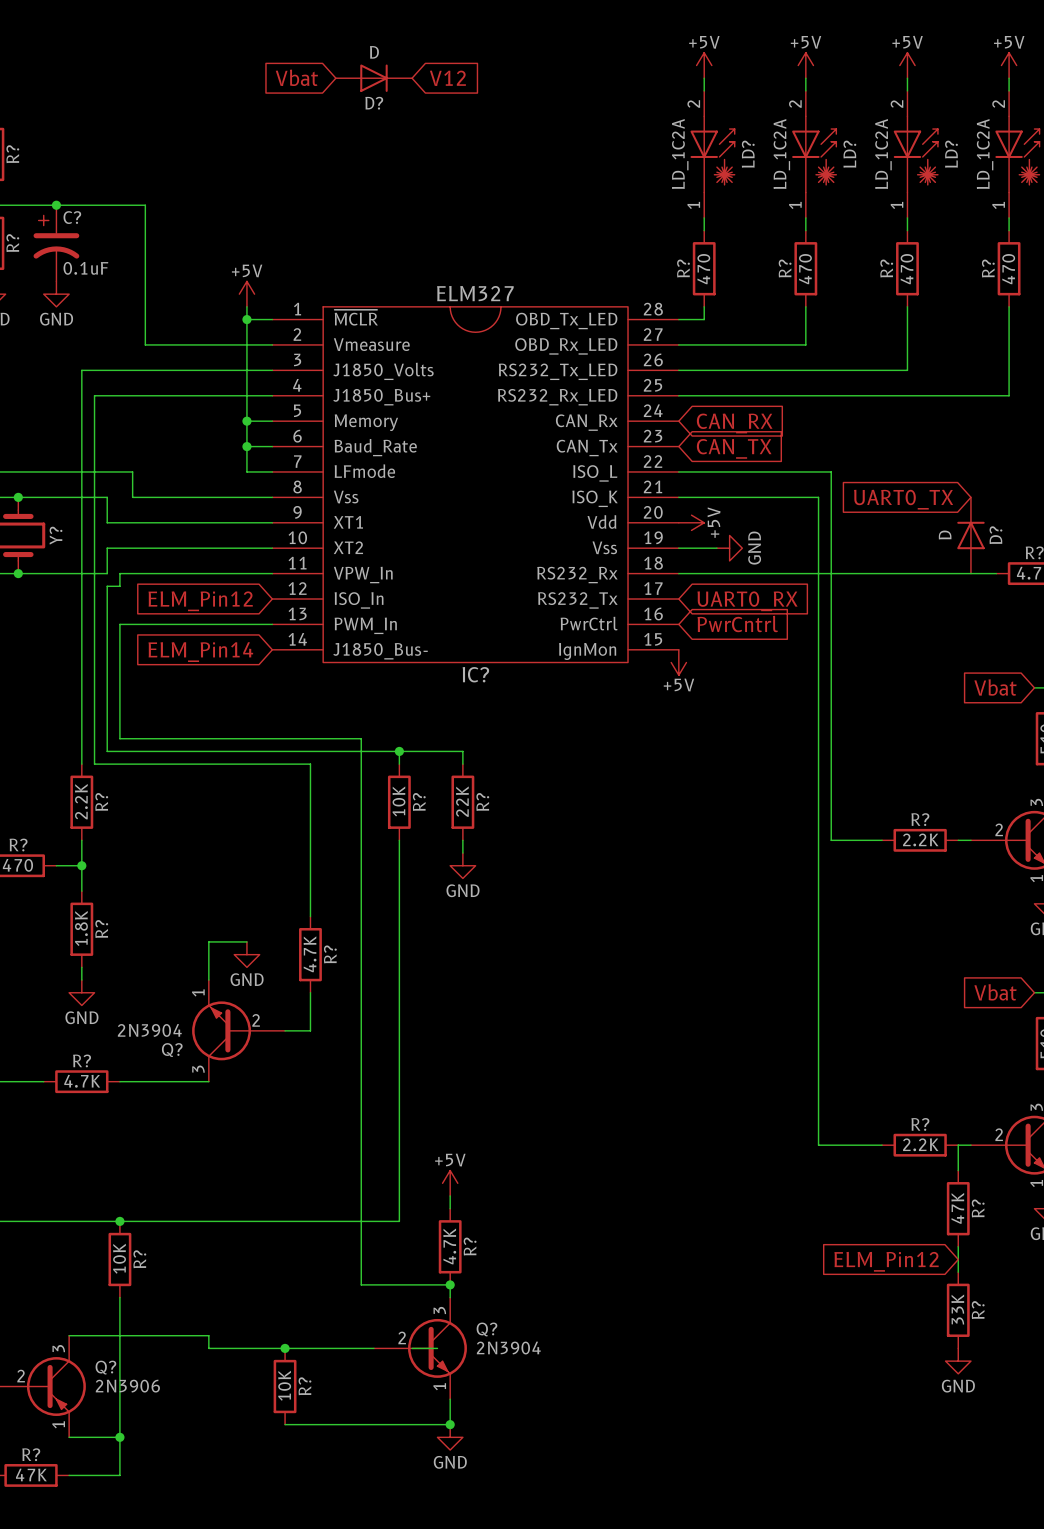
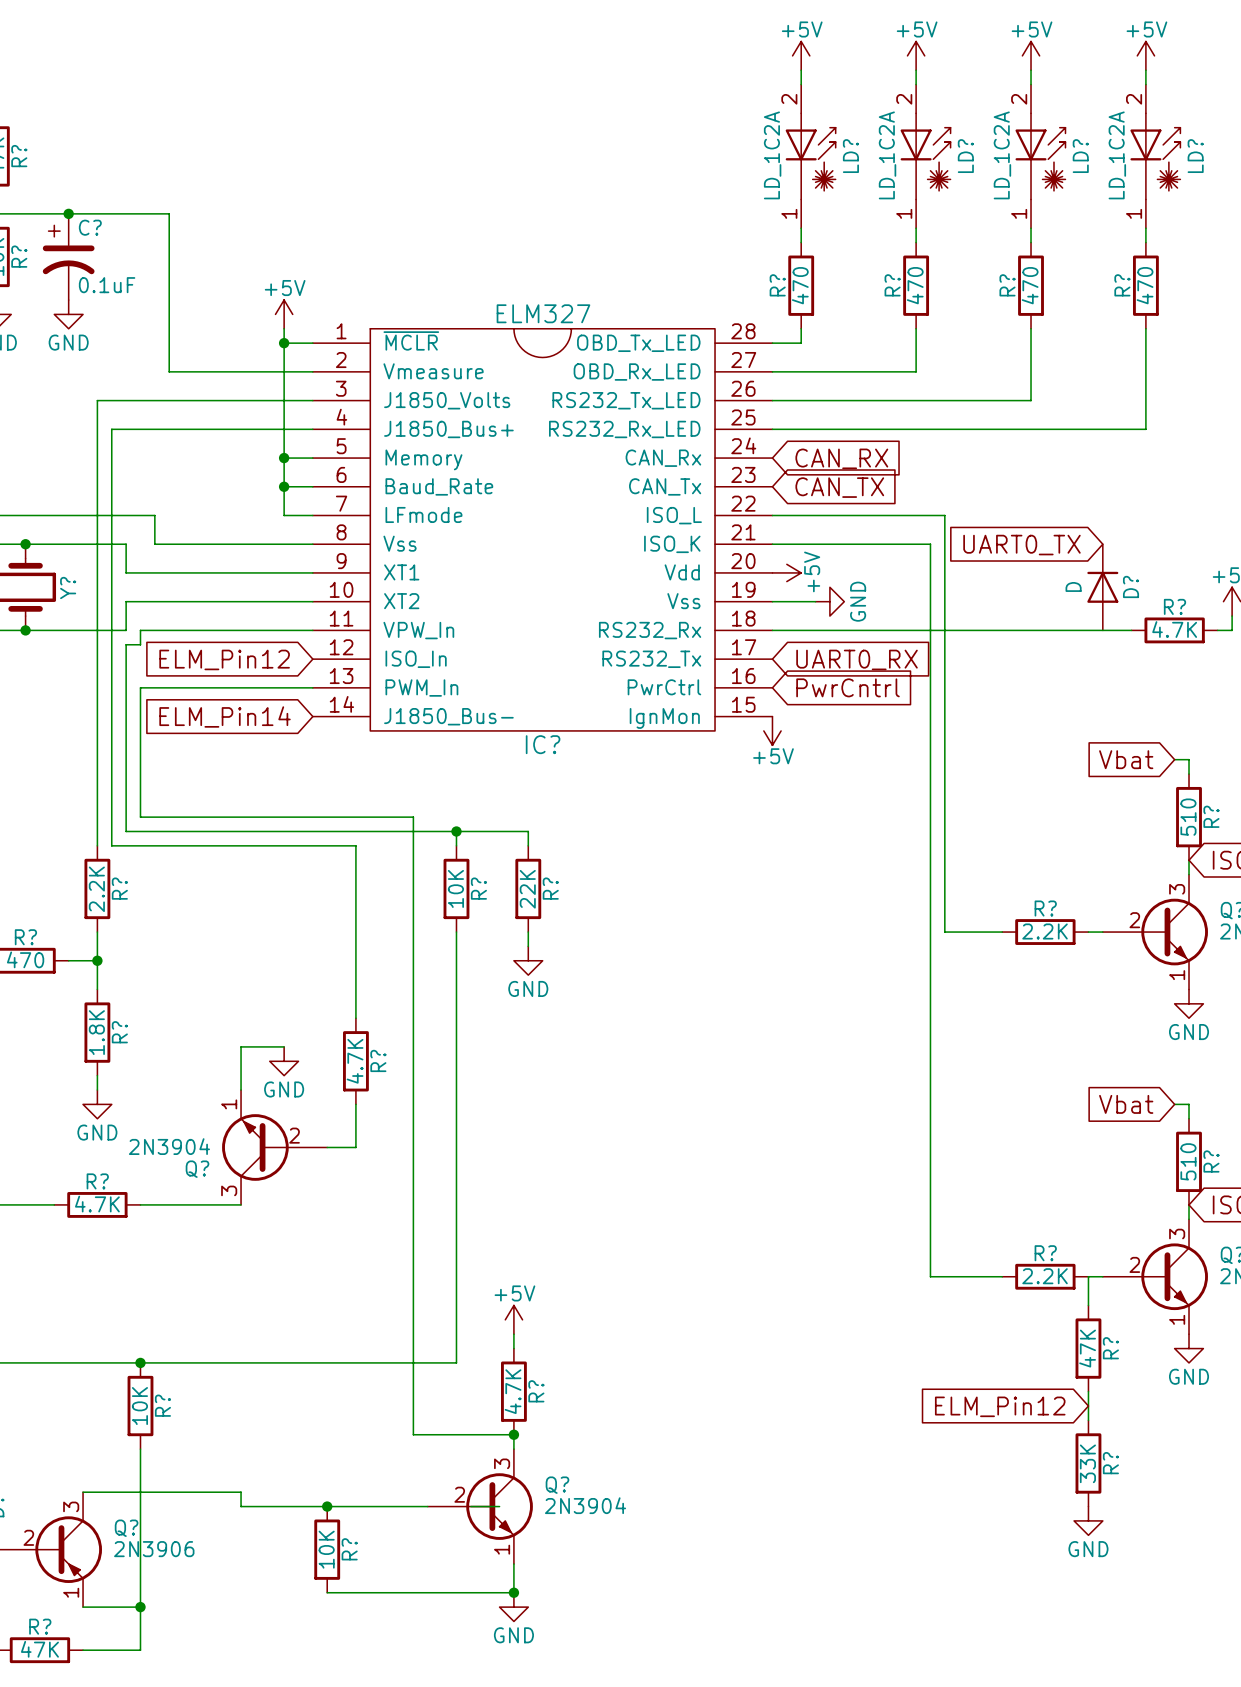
global label: Vbat (296, 77) -> none
D?: D (373, 78) -> none
global label: V12 (447, 78) -> none

